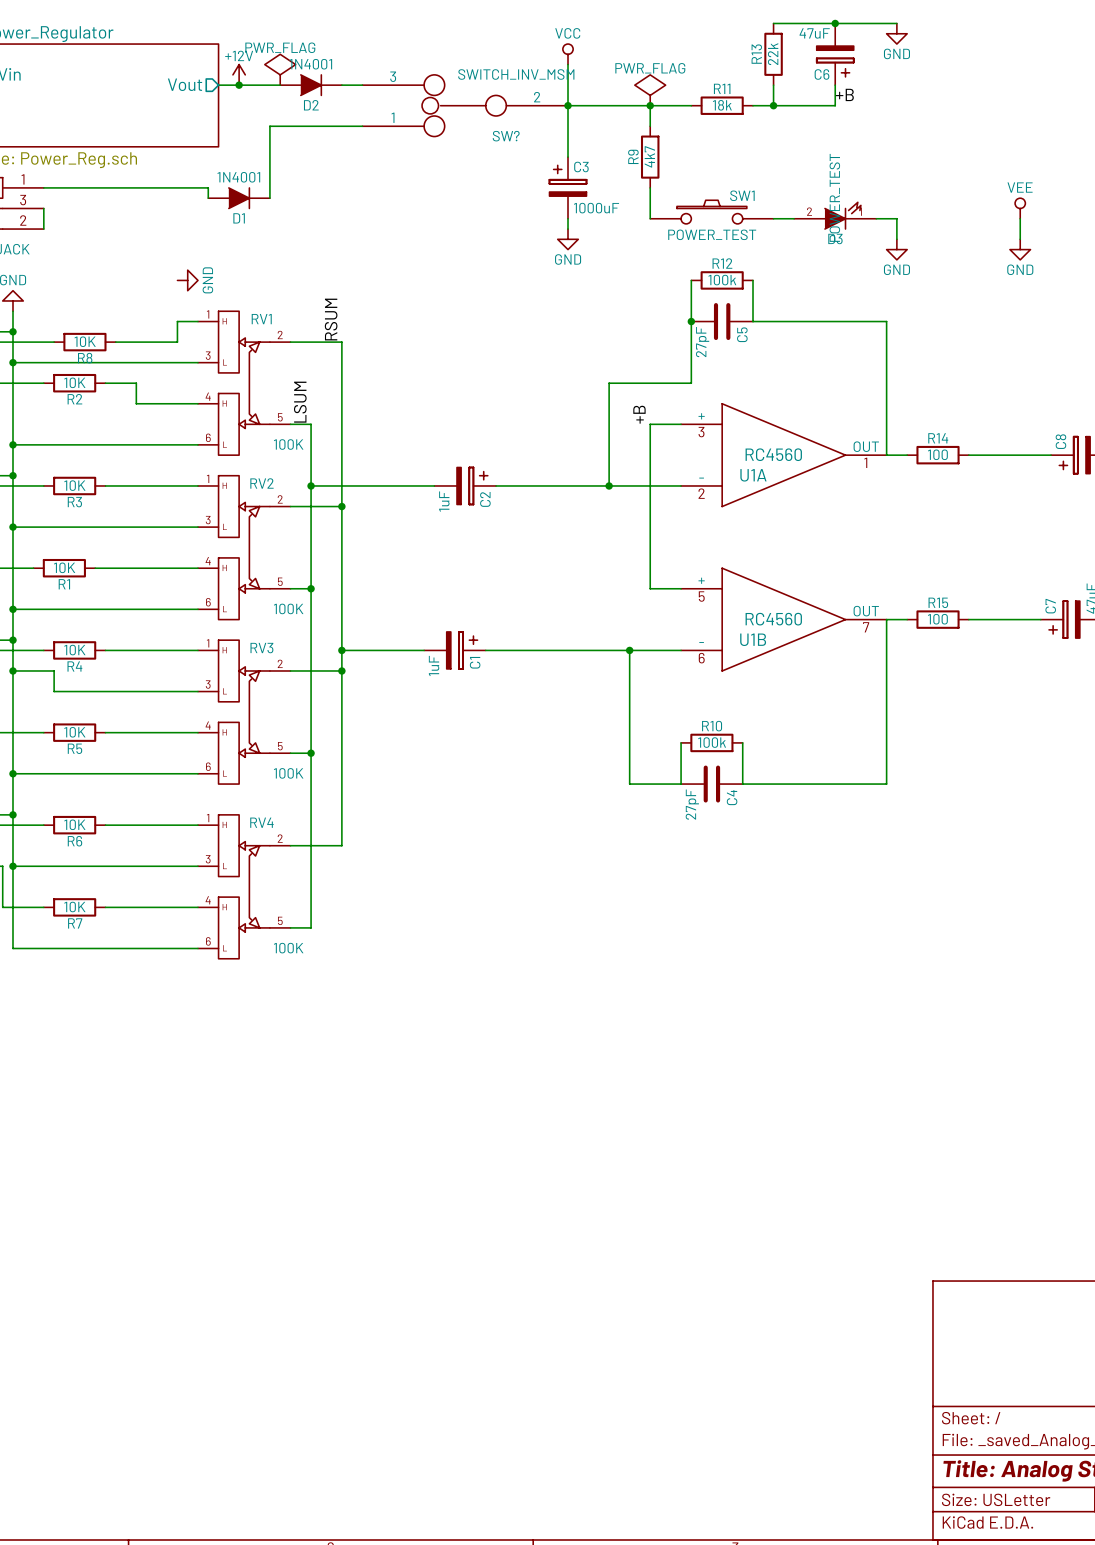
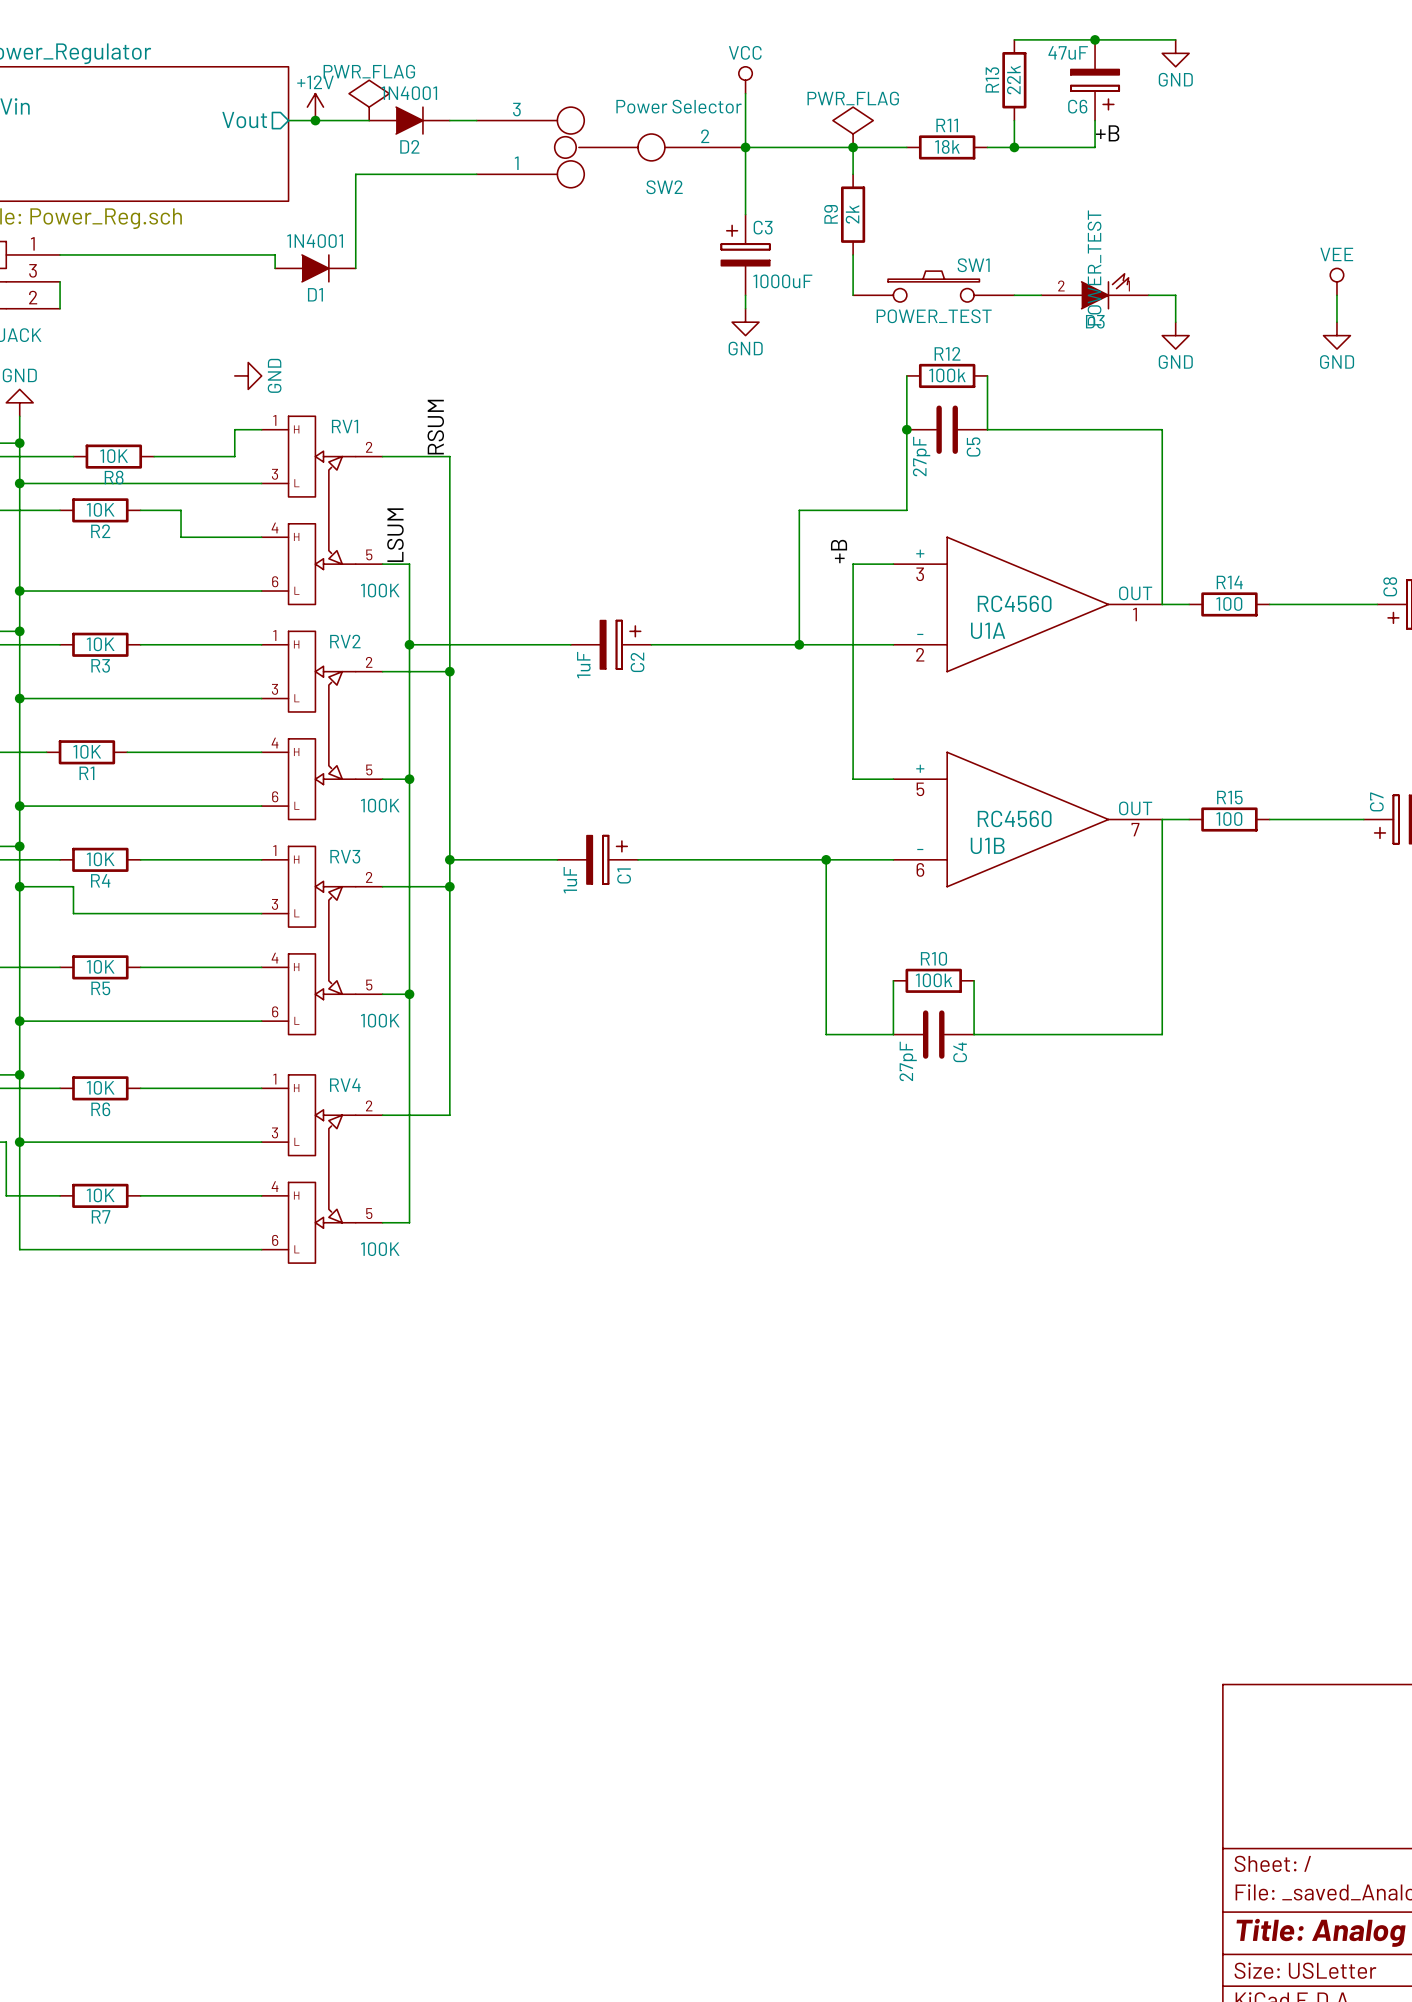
SW? value: SWITCH_INV_MSM (516, 74) -> Power Selector (679, 106)
SW? name: SW? (506, 136) -> SW2 (664, 187)
R9 value: 4k7 (649, 156) -> 2k (852, 214)

